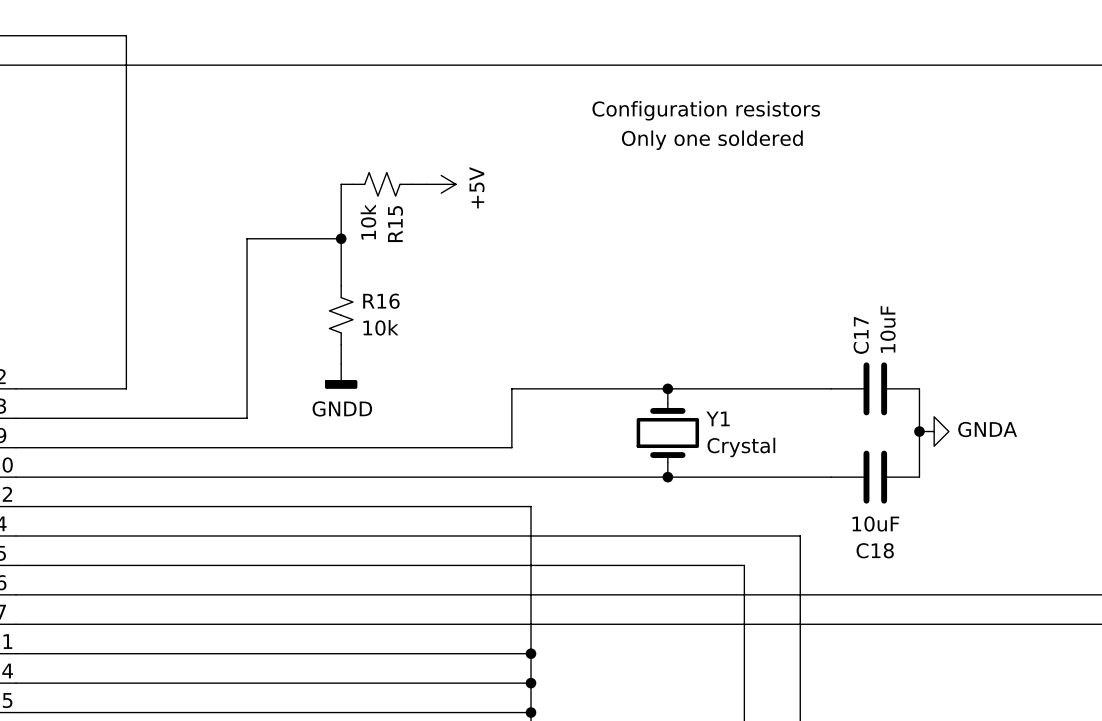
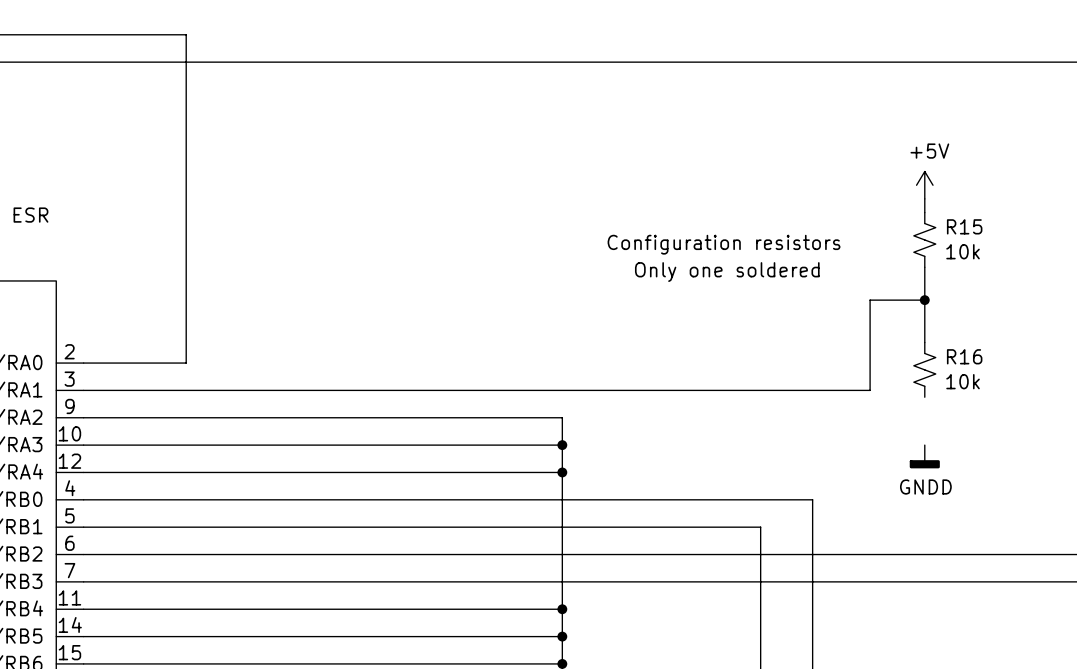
text position: Configuration resistors (706, 110) -> Configuration resistors (724, 244)
text position: Only one soldered (712, 140) -> Only one soldered (727, 272)
wire: (352, 184) (341, 184) (341, 285) -> none
R15 rotation: 0° (382, 184) -> 90° clockwise (924, 239)
R15 position: (382, 184) -> (924, 239)
wire: (411, 184) (426, 184) -> none
power symbol: +5V (441, 184) -> none
power symbol: none -> +5V (924, 185)
wire: none -> (924, 198) (924, 212)
R15 value position: 10k (368, 221) -> 10k (963, 251)
R15 name position: R15 (395, 224) -> R15 (964, 226)
wire: (341, 238) (247, 238) (247, 418) -> (924, 300) (870, 300) (870, 390) (298, 390)
junction: (341, 238) -> none
wire: none -> (924, 267) (924, 342)
R16 position: (341, 315) -> (924, 369)
junction: none -> (924, 300)
wire: (341, 344) (341, 363) -> none
power symbol: GNDD (341, 376) -> none
junction: (667, 388) -> none
wire: (831, 388) (511, 388) (511, 447) -> (562, 472) (562, 417) (544, 417)
C17: 10uF (875, 388) -> none
wire: (919, 388) (919, 477) -> none
junction: (919, 431) -> none
power symbol: GNDA (934, 431) -> none
Y1: Crystal (667, 432) -> none
wire: (531, 477) (831, 477) -> none
junction: none -> (562, 445)
junction: (667, 477) -> none
C18: 10uF (875, 477) -> none
power symbol: none -> GNDD (924, 456)
junction: none -> (562, 472)

